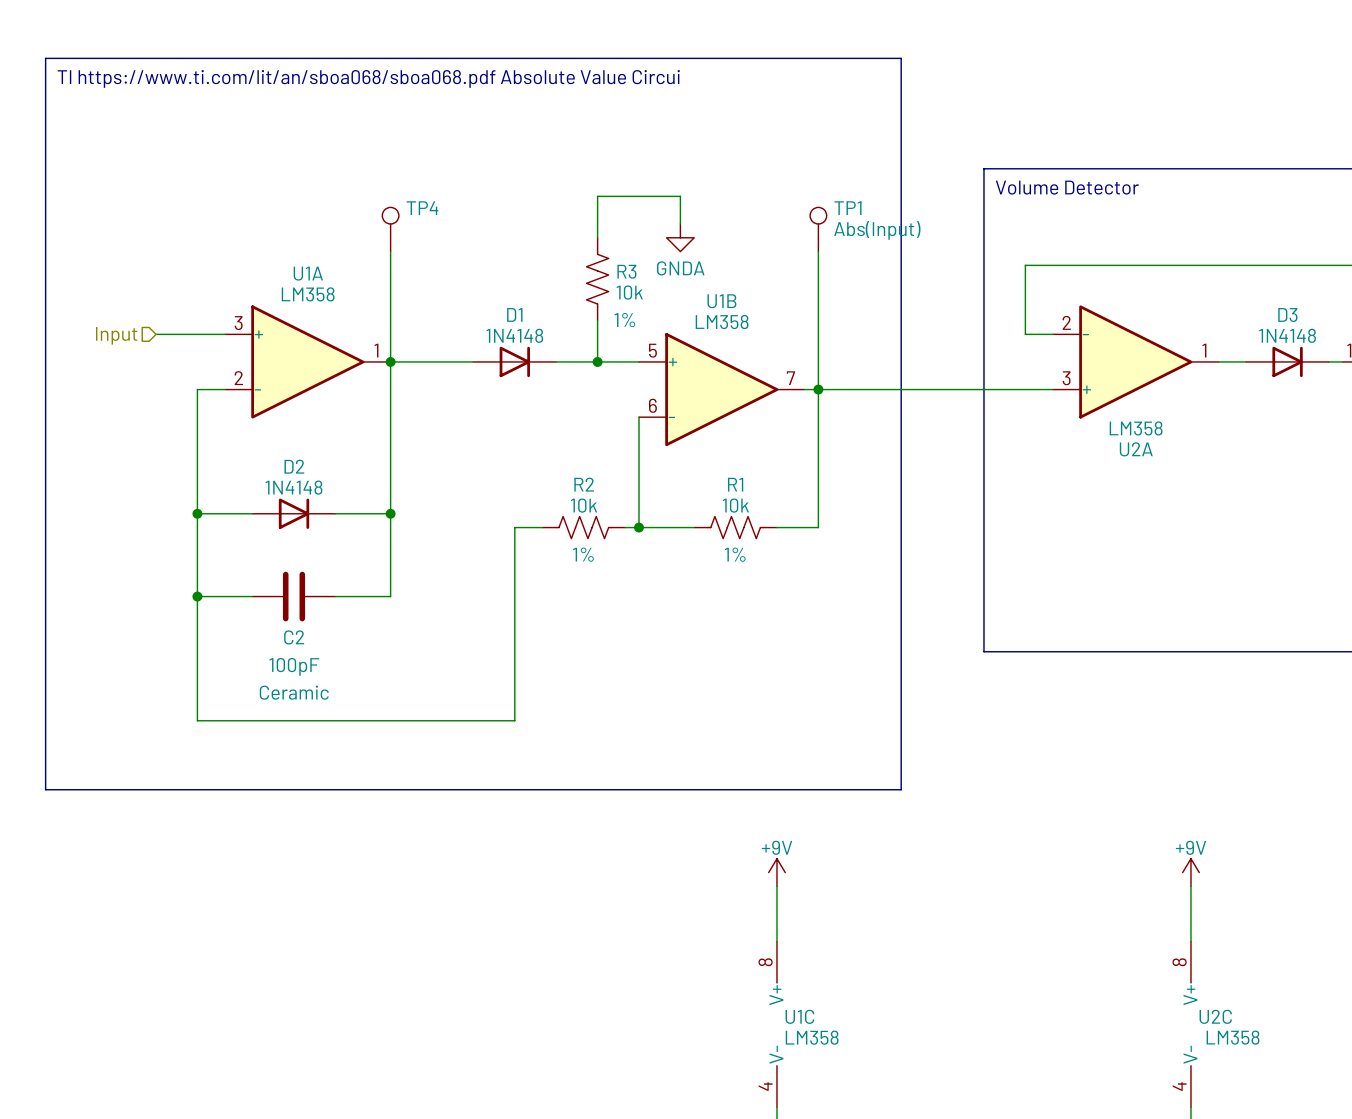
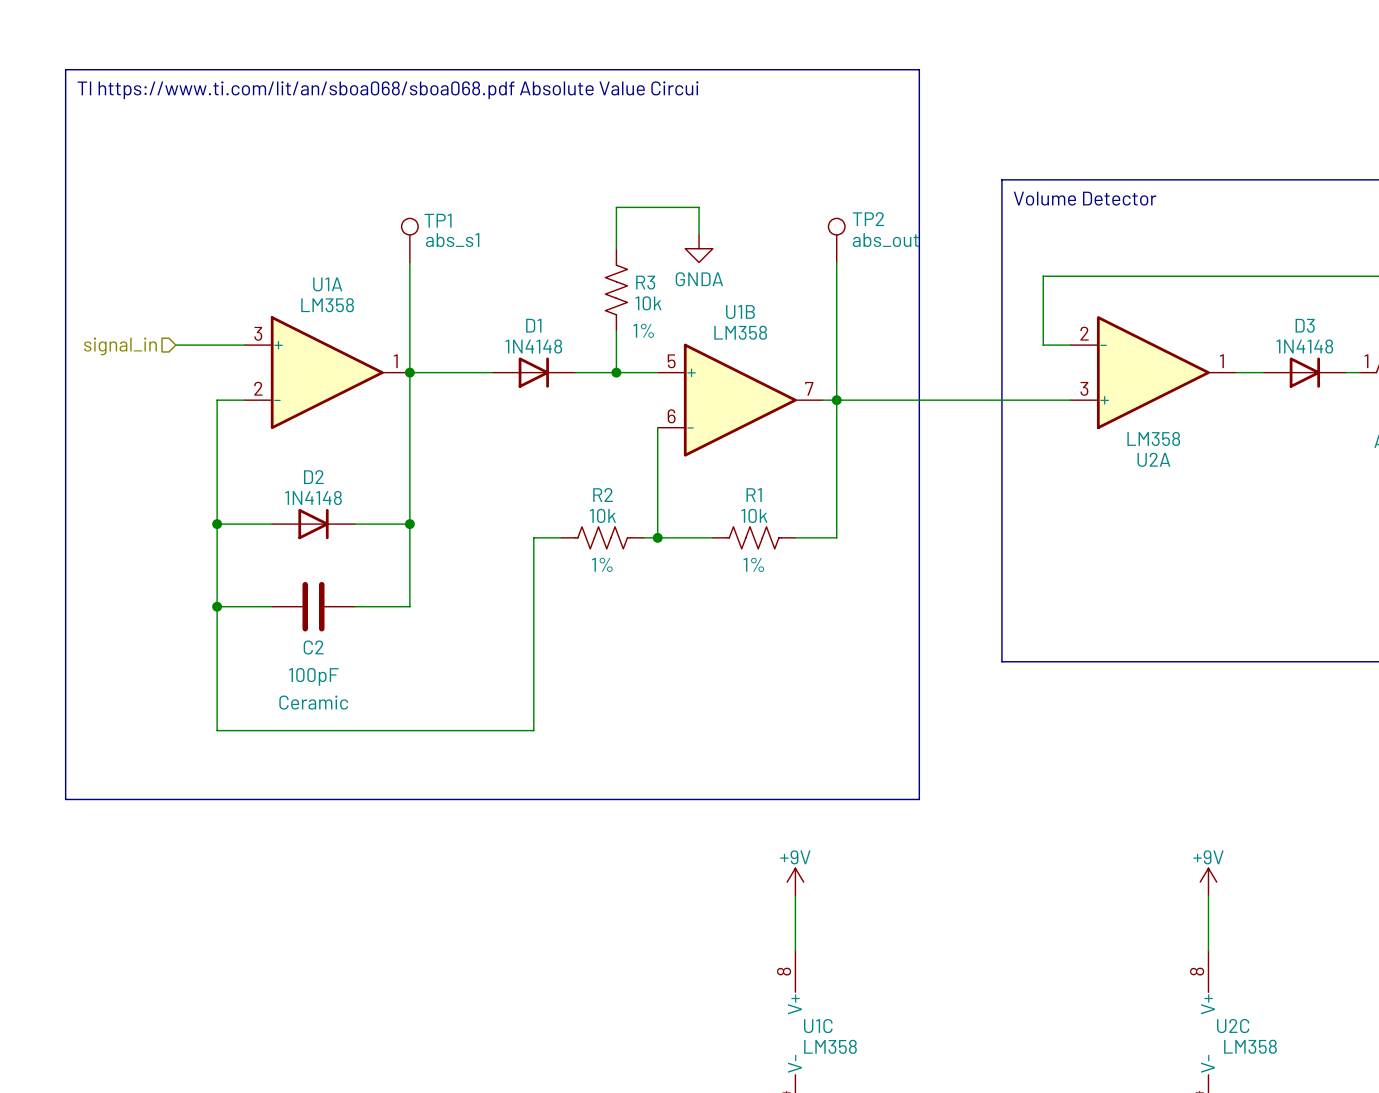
TP4 name: TP4 (422, 208) -> TP1 (438, 220)
TP1 name: TP1 (847, 208) -> TP2 (868, 219)
TP4 value: none -> abs_s1 (452, 240)
TP1 value: Abs(Input) (877, 230) -> abs_out (885, 240)
hierarchical label: Input (116, 335) -> signal_in (120, 346)

